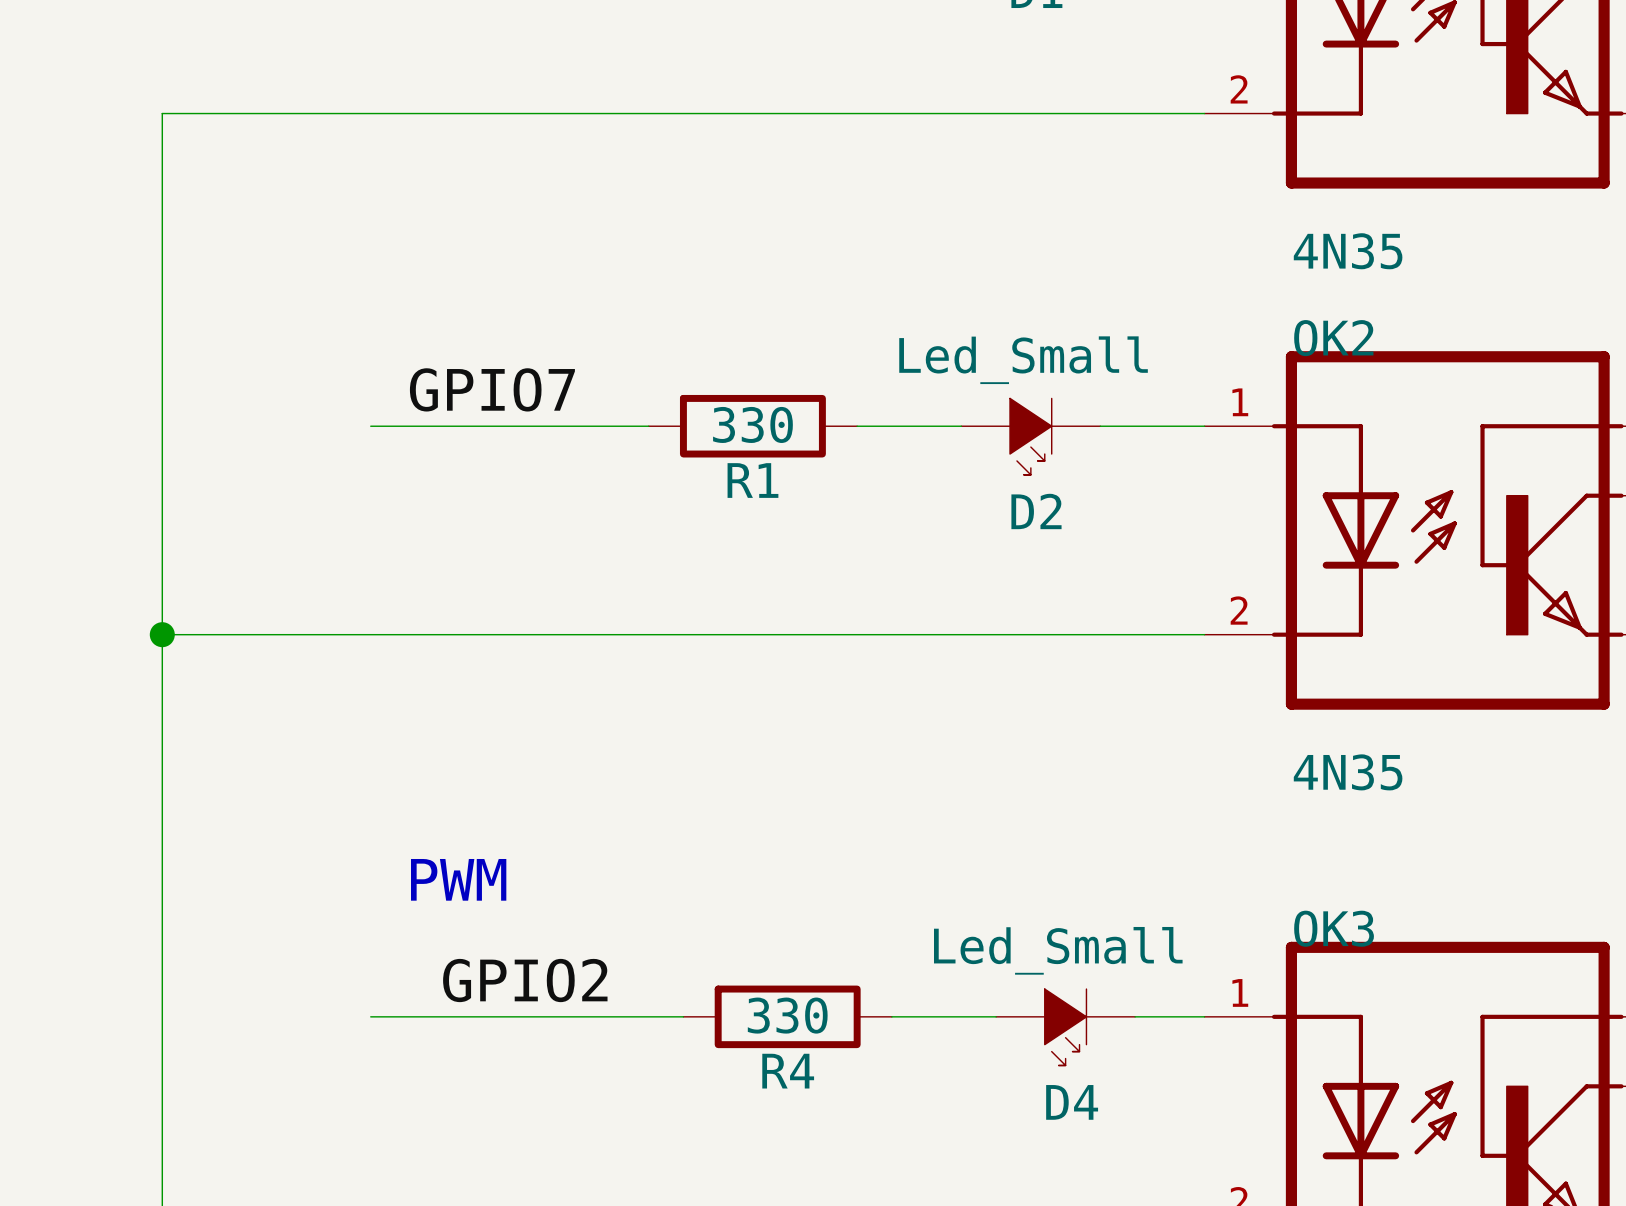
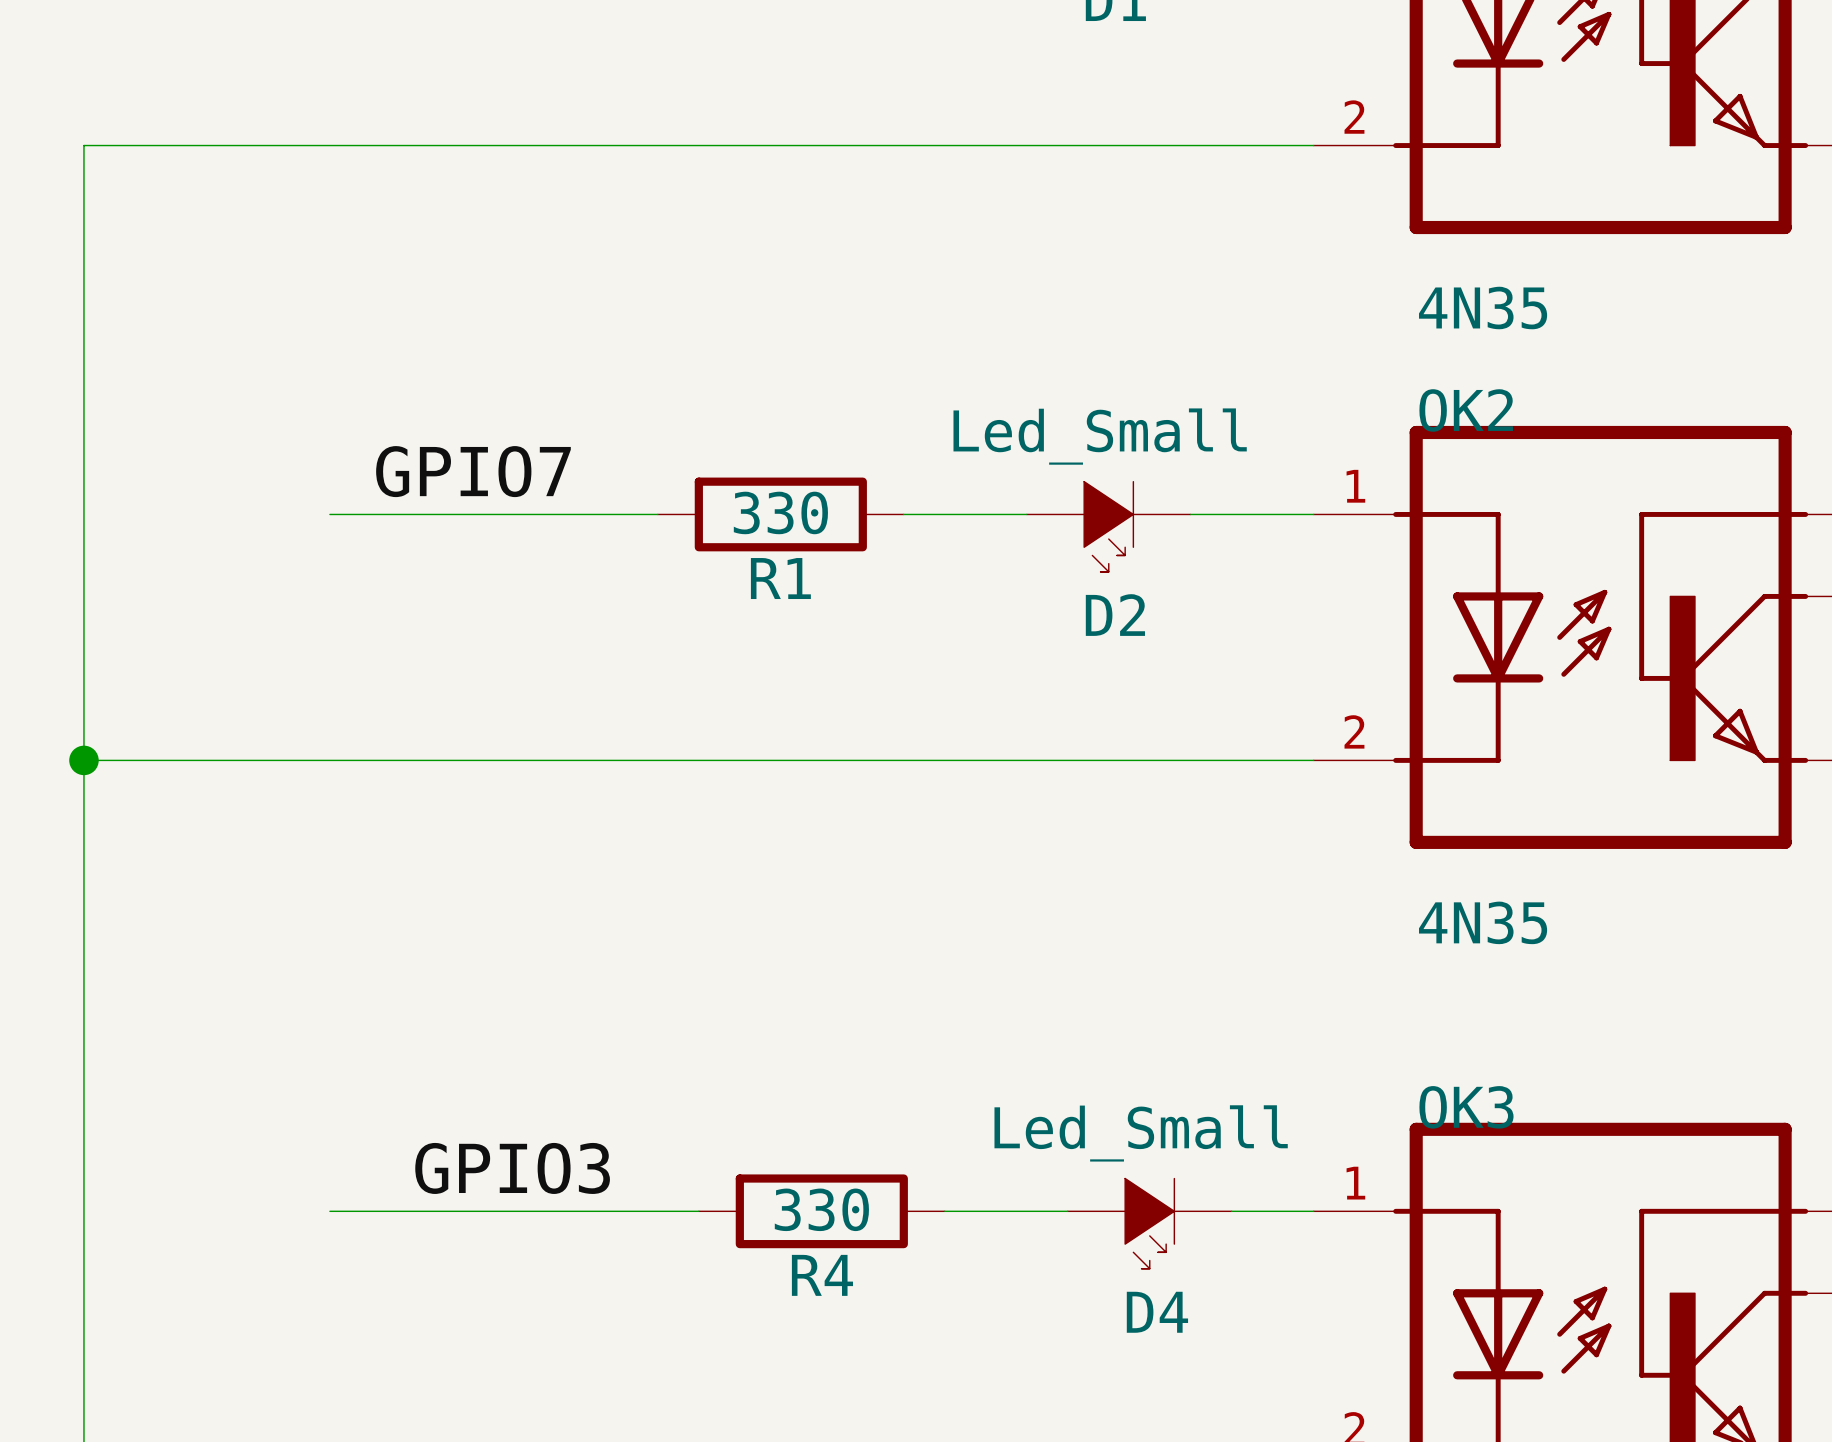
text: PWM (458, 879) -> none
label: GPIO2 (525, 980) -> GPIO3 (512, 1168)

